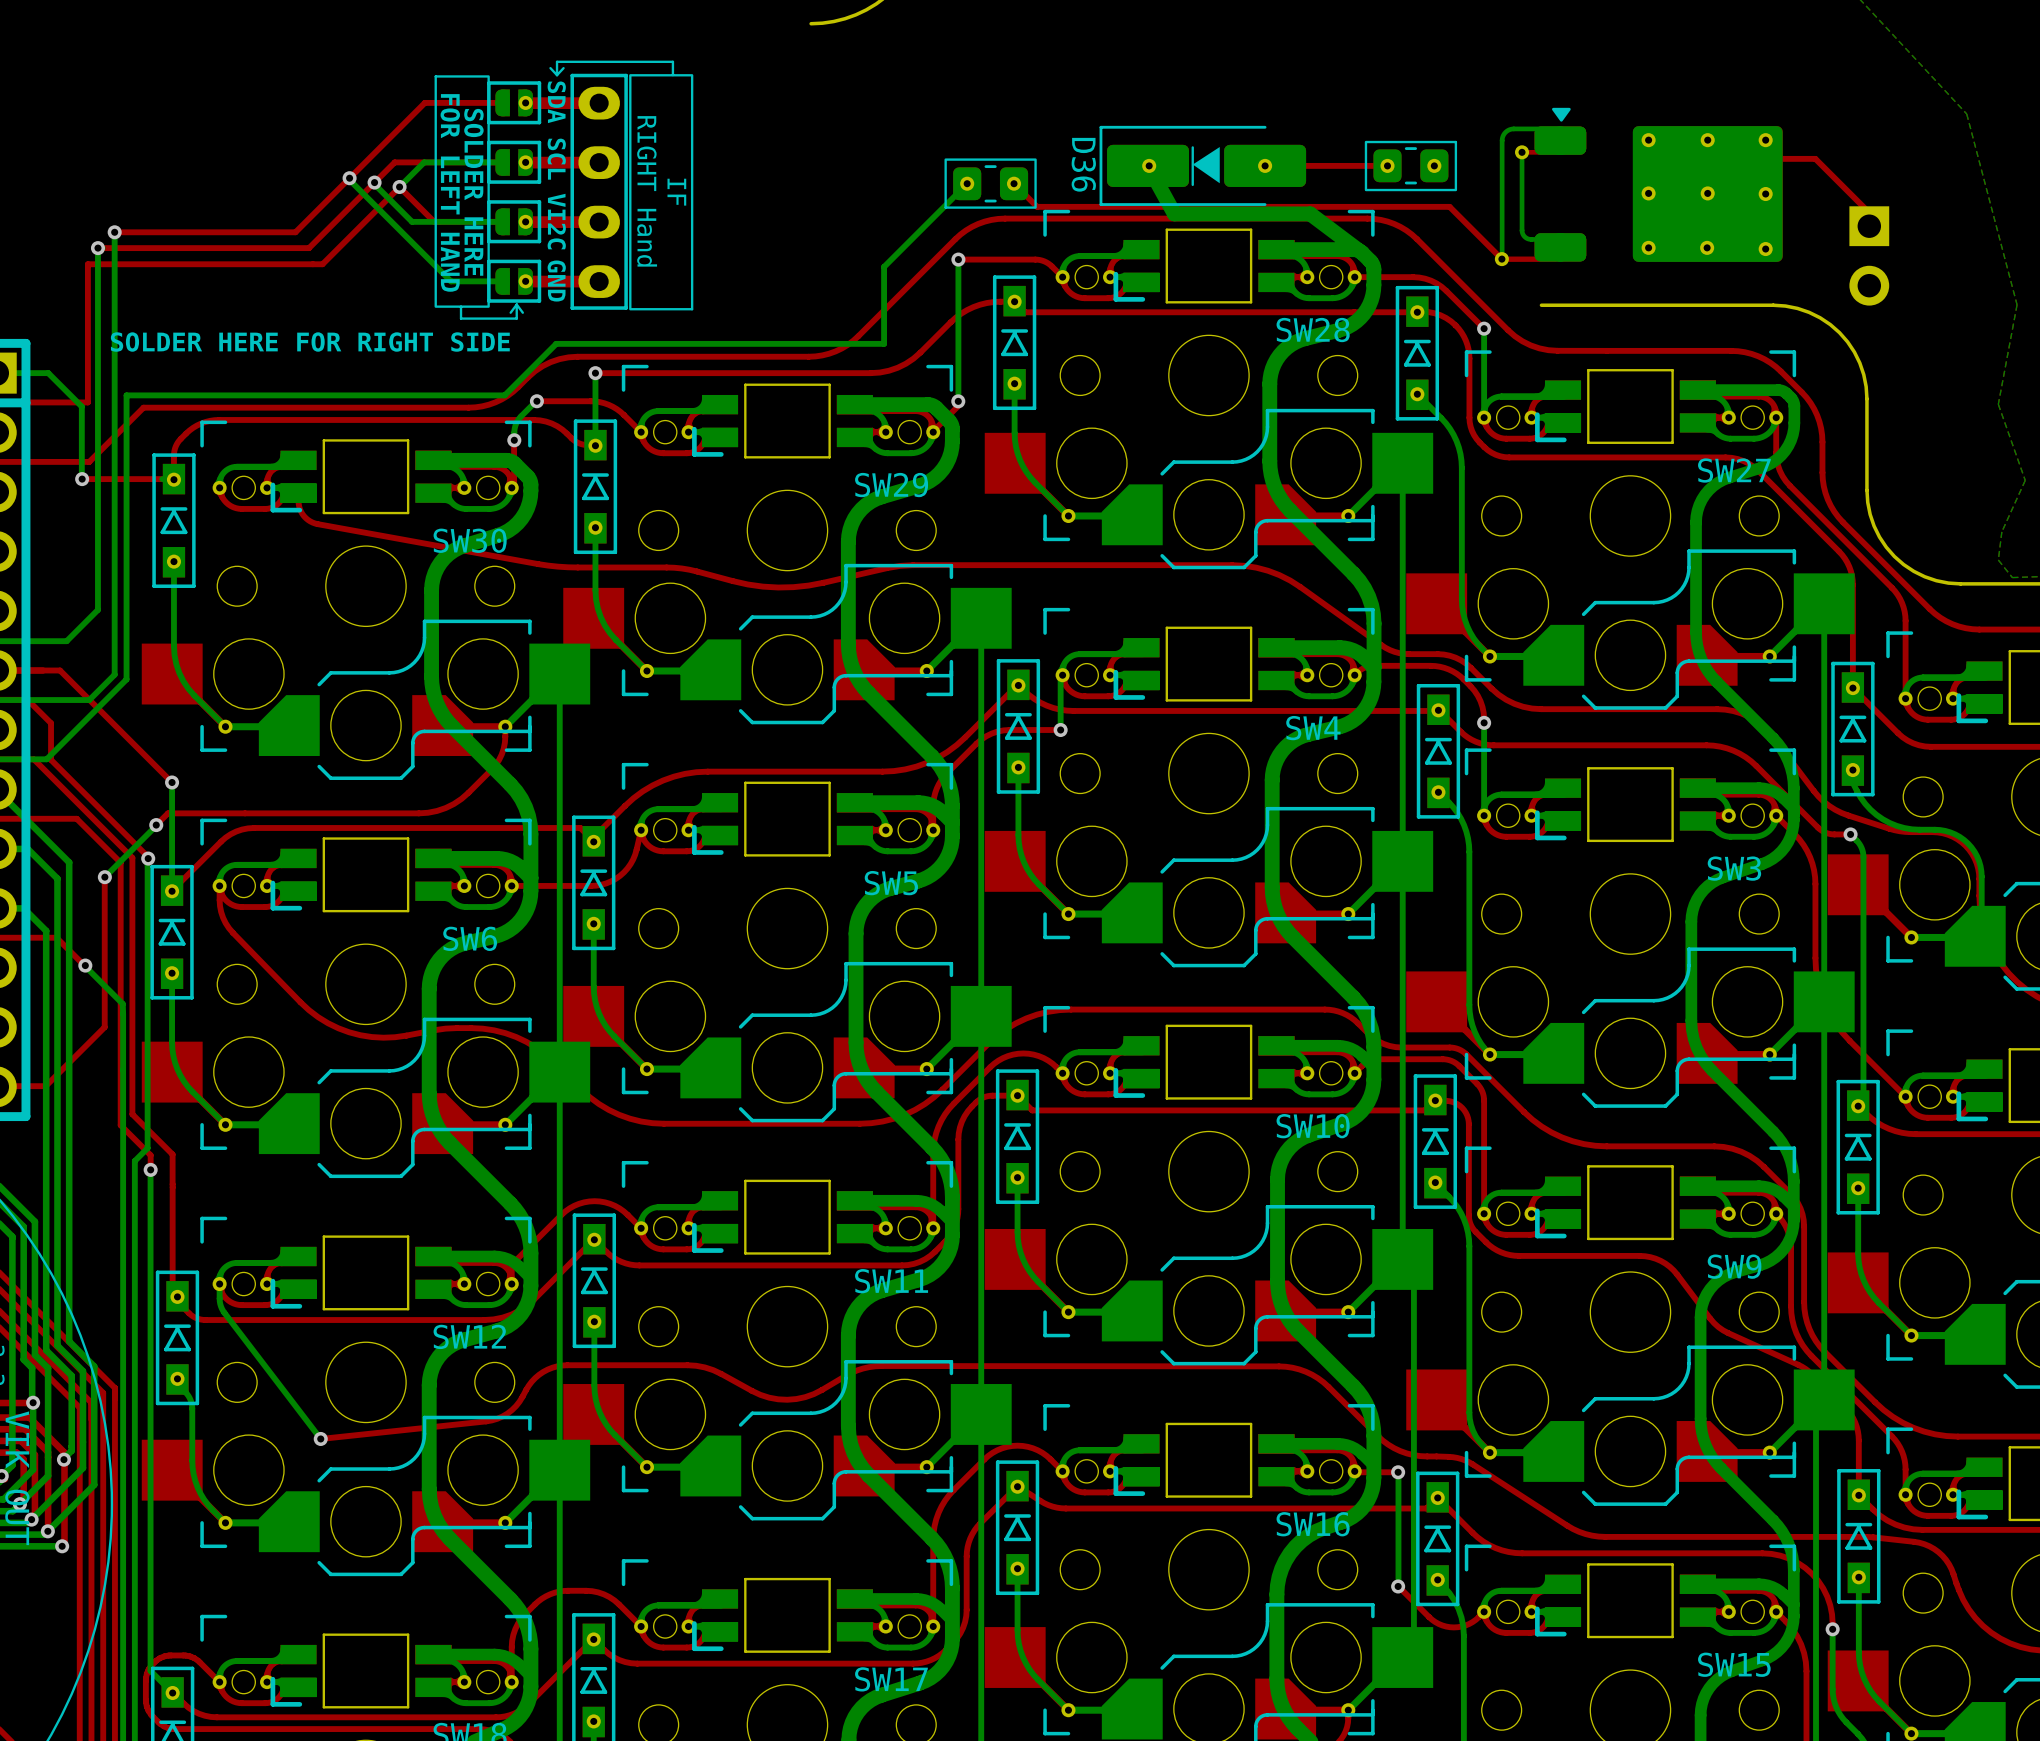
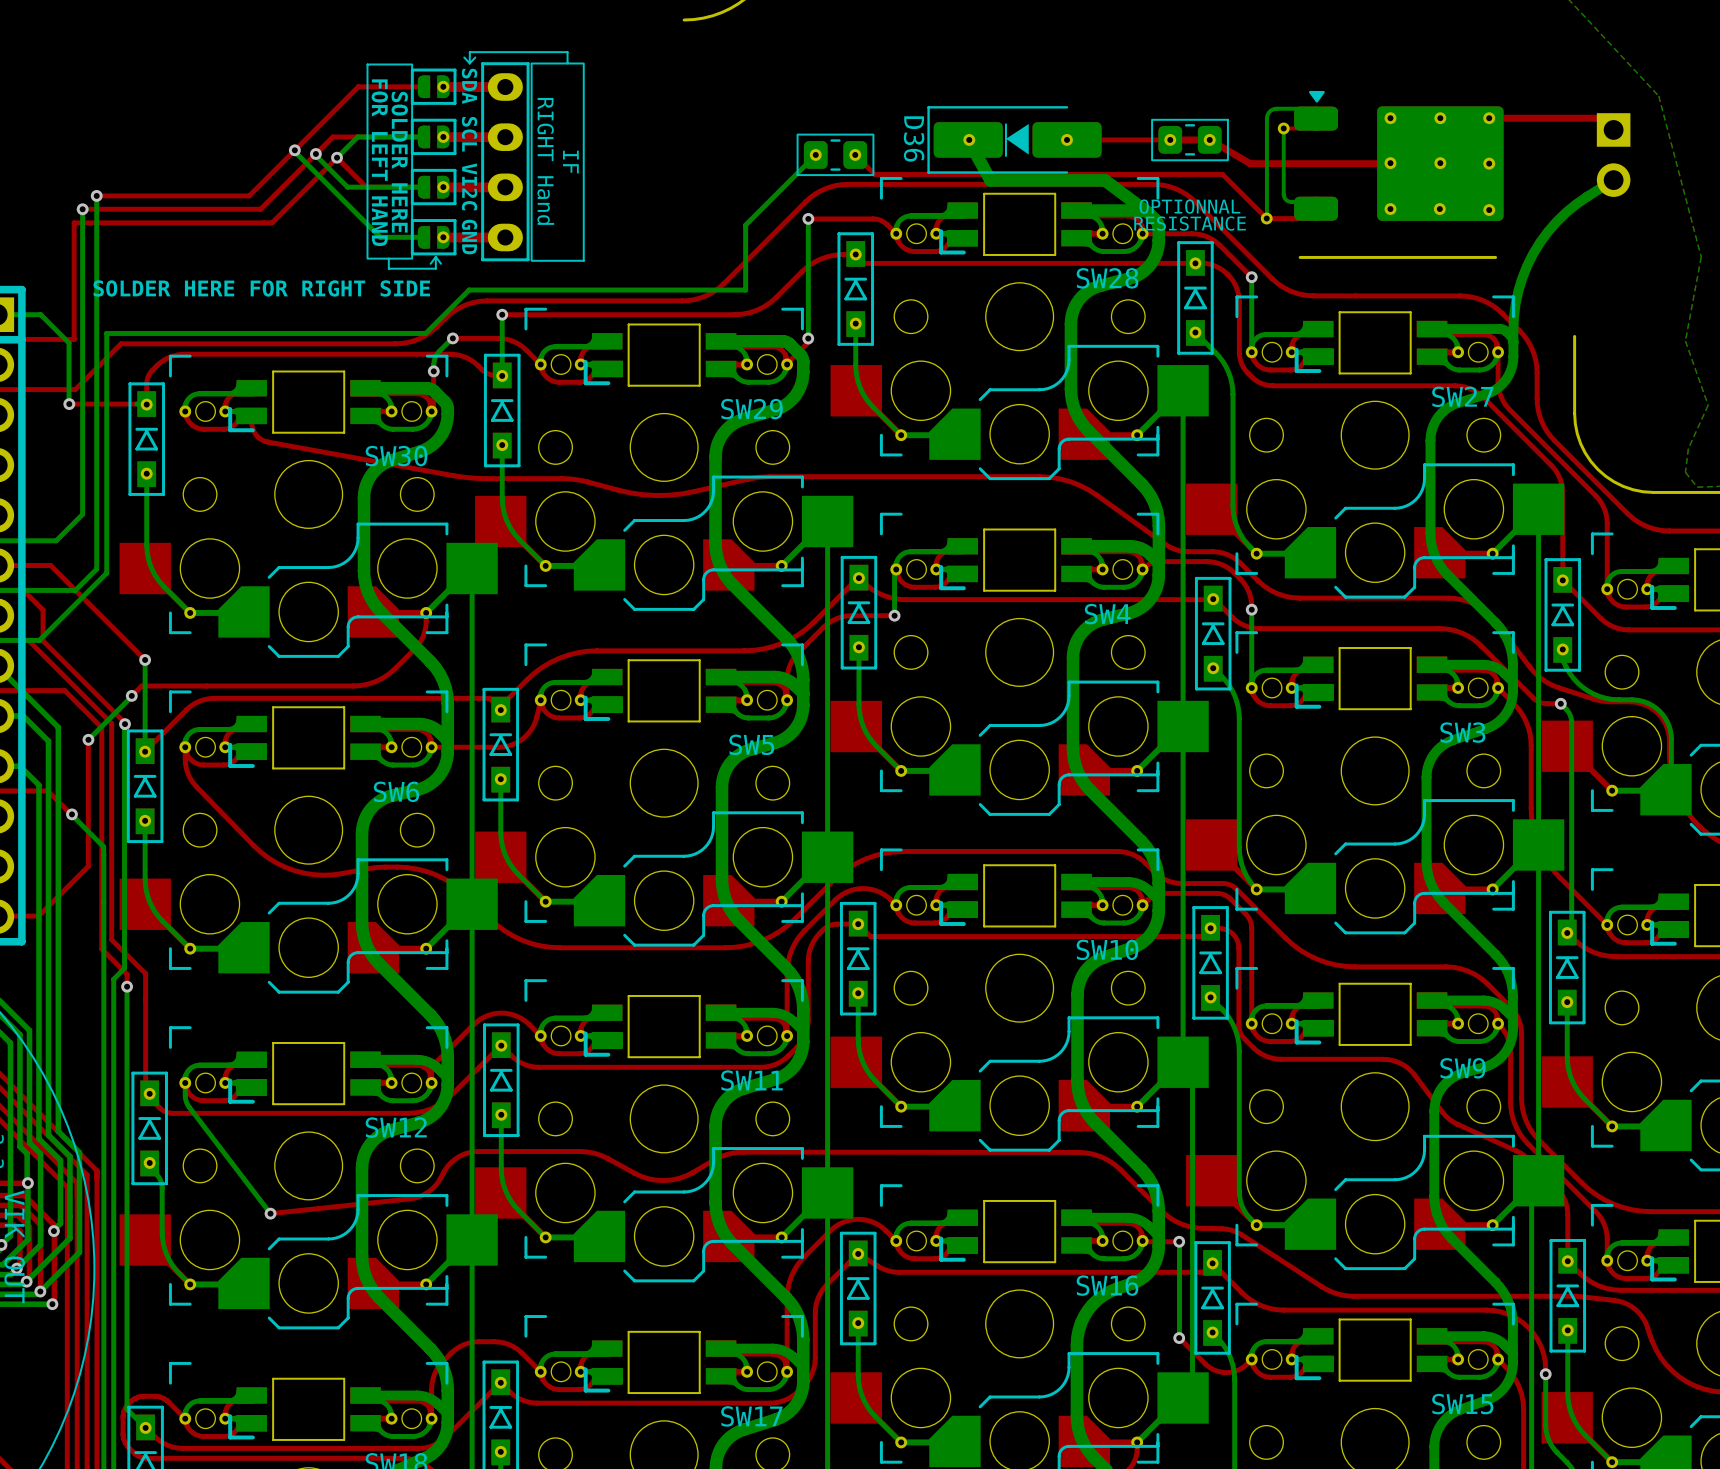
top track: none -> (1489, 118) (1601, 118) (1613, 129)
top track: (1707, 194) (1743, 158) (1815, 158) (1869, 212) (1869, 226) -> (1440, 163) (1250, 163) (1209, 139) (1170, 139)
bottom track: none -> (1613, 180) (1566, 212) (1540, 242) (1527, 265) (1518, 291) (1513, 317) (1513, 342)
part text: none -> OPTIONNAL (1189, 206)
part position: (1869, 255) -> (1613, 155)
part text: none -> RESISTANCE (1190, 223)
board edge: (1773, 305) (1785, 306) (1809, 312) (1820, 317) (1839, 332) (1854, 352) (1859, 363) (1863, 374) (1866, 398) -> none

